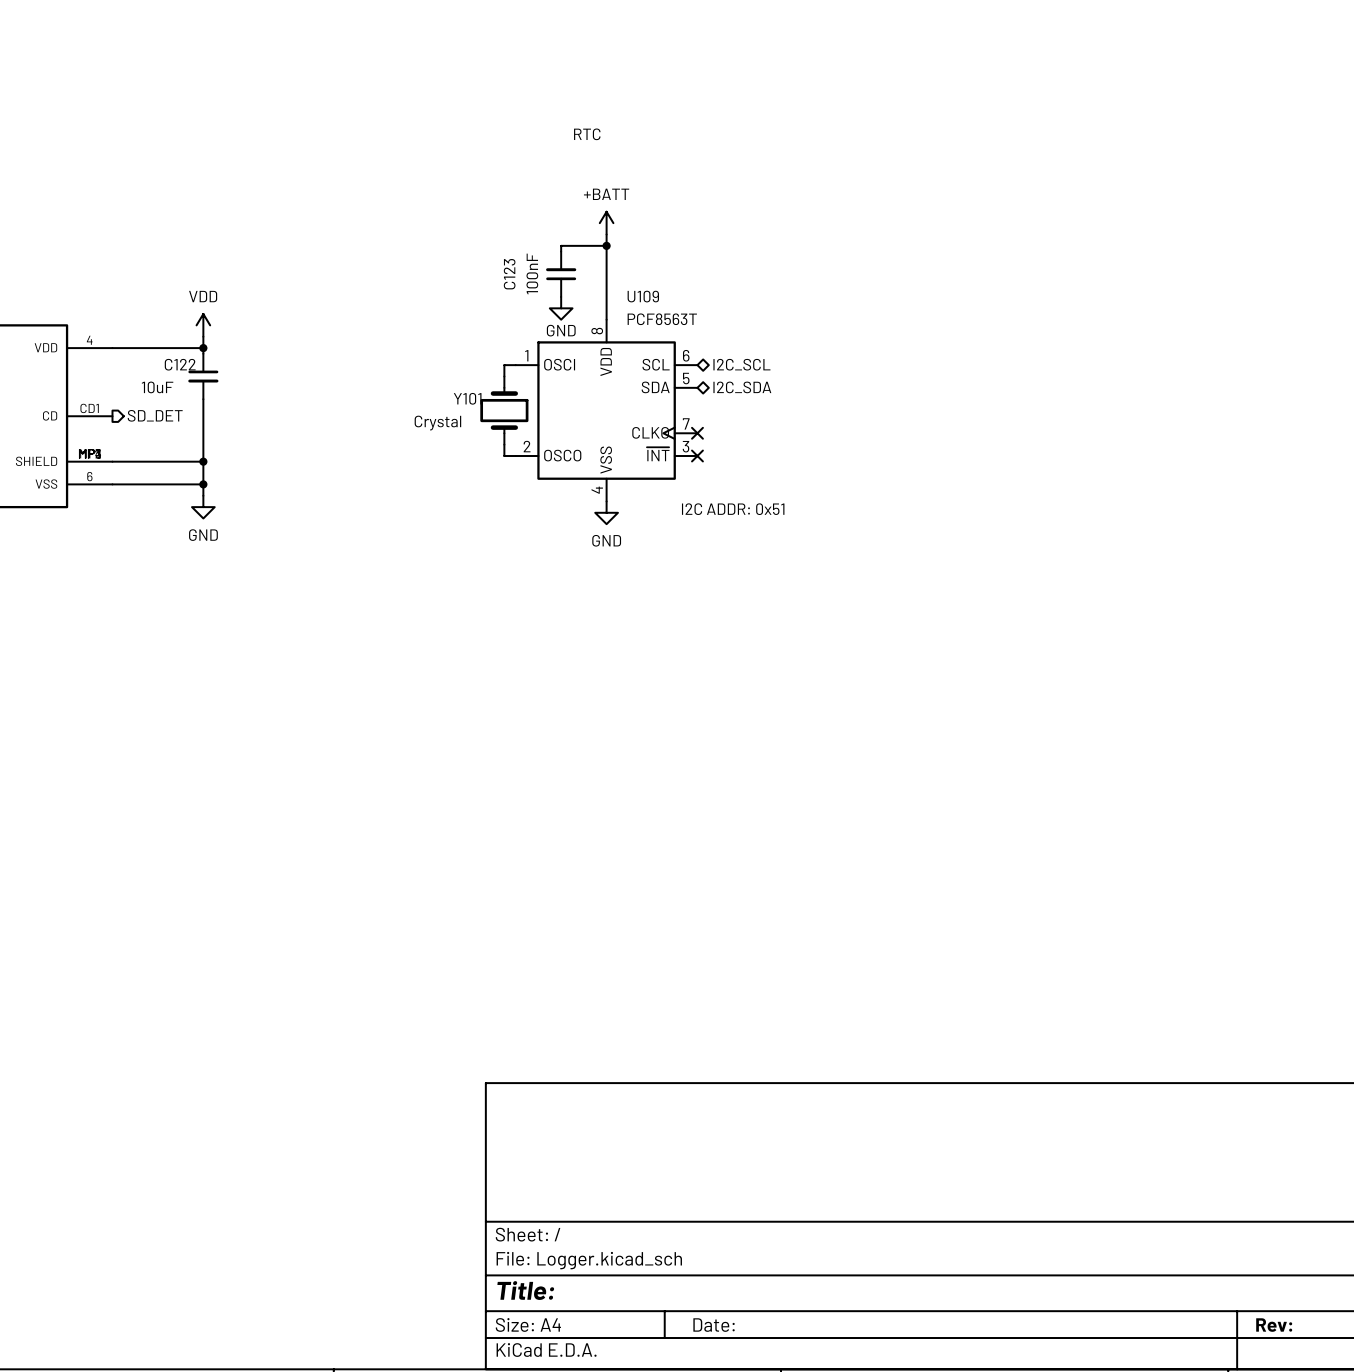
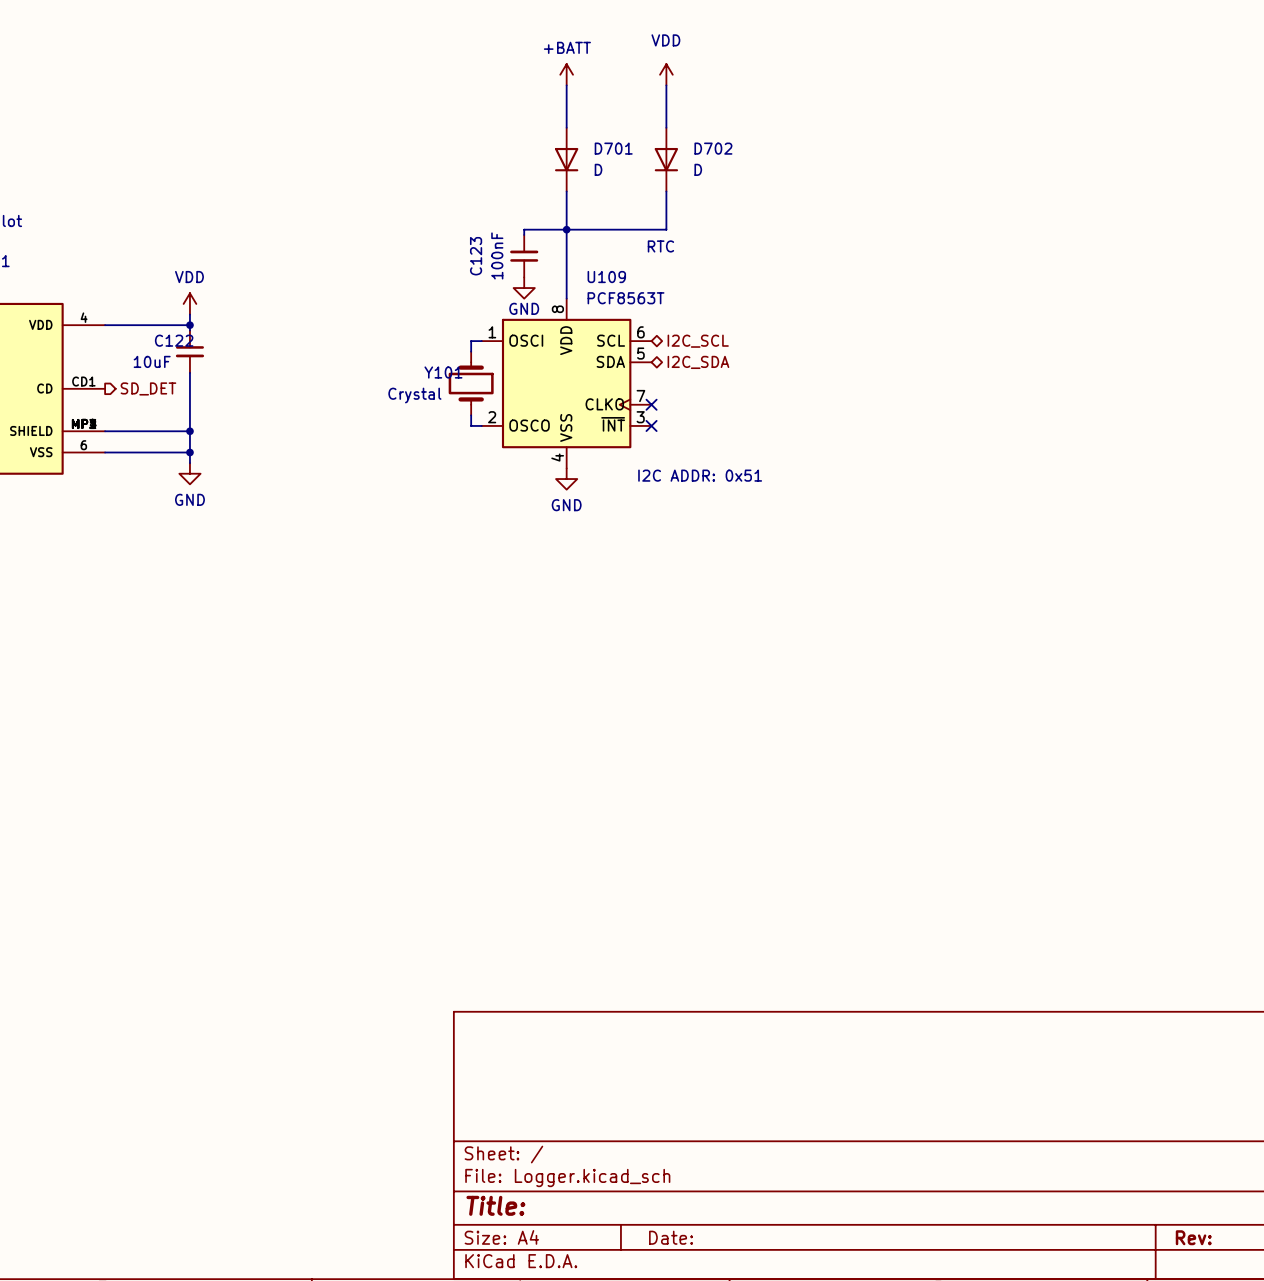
power symbol: none -> VDD (666, 74)
wire: none -> (566, 85) (566, 127)
wire: none -> (666, 85) (666, 127)
text position: RTC (587, 134) -> RTC (660, 246)
D701: none -> D (566, 159)
D702: none -> D (666, 159)
wire: none -> (666, 191) (666, 229) (566, 229)
power symbol position: +BATT (606, 223) -> +BATT (566, 74)

